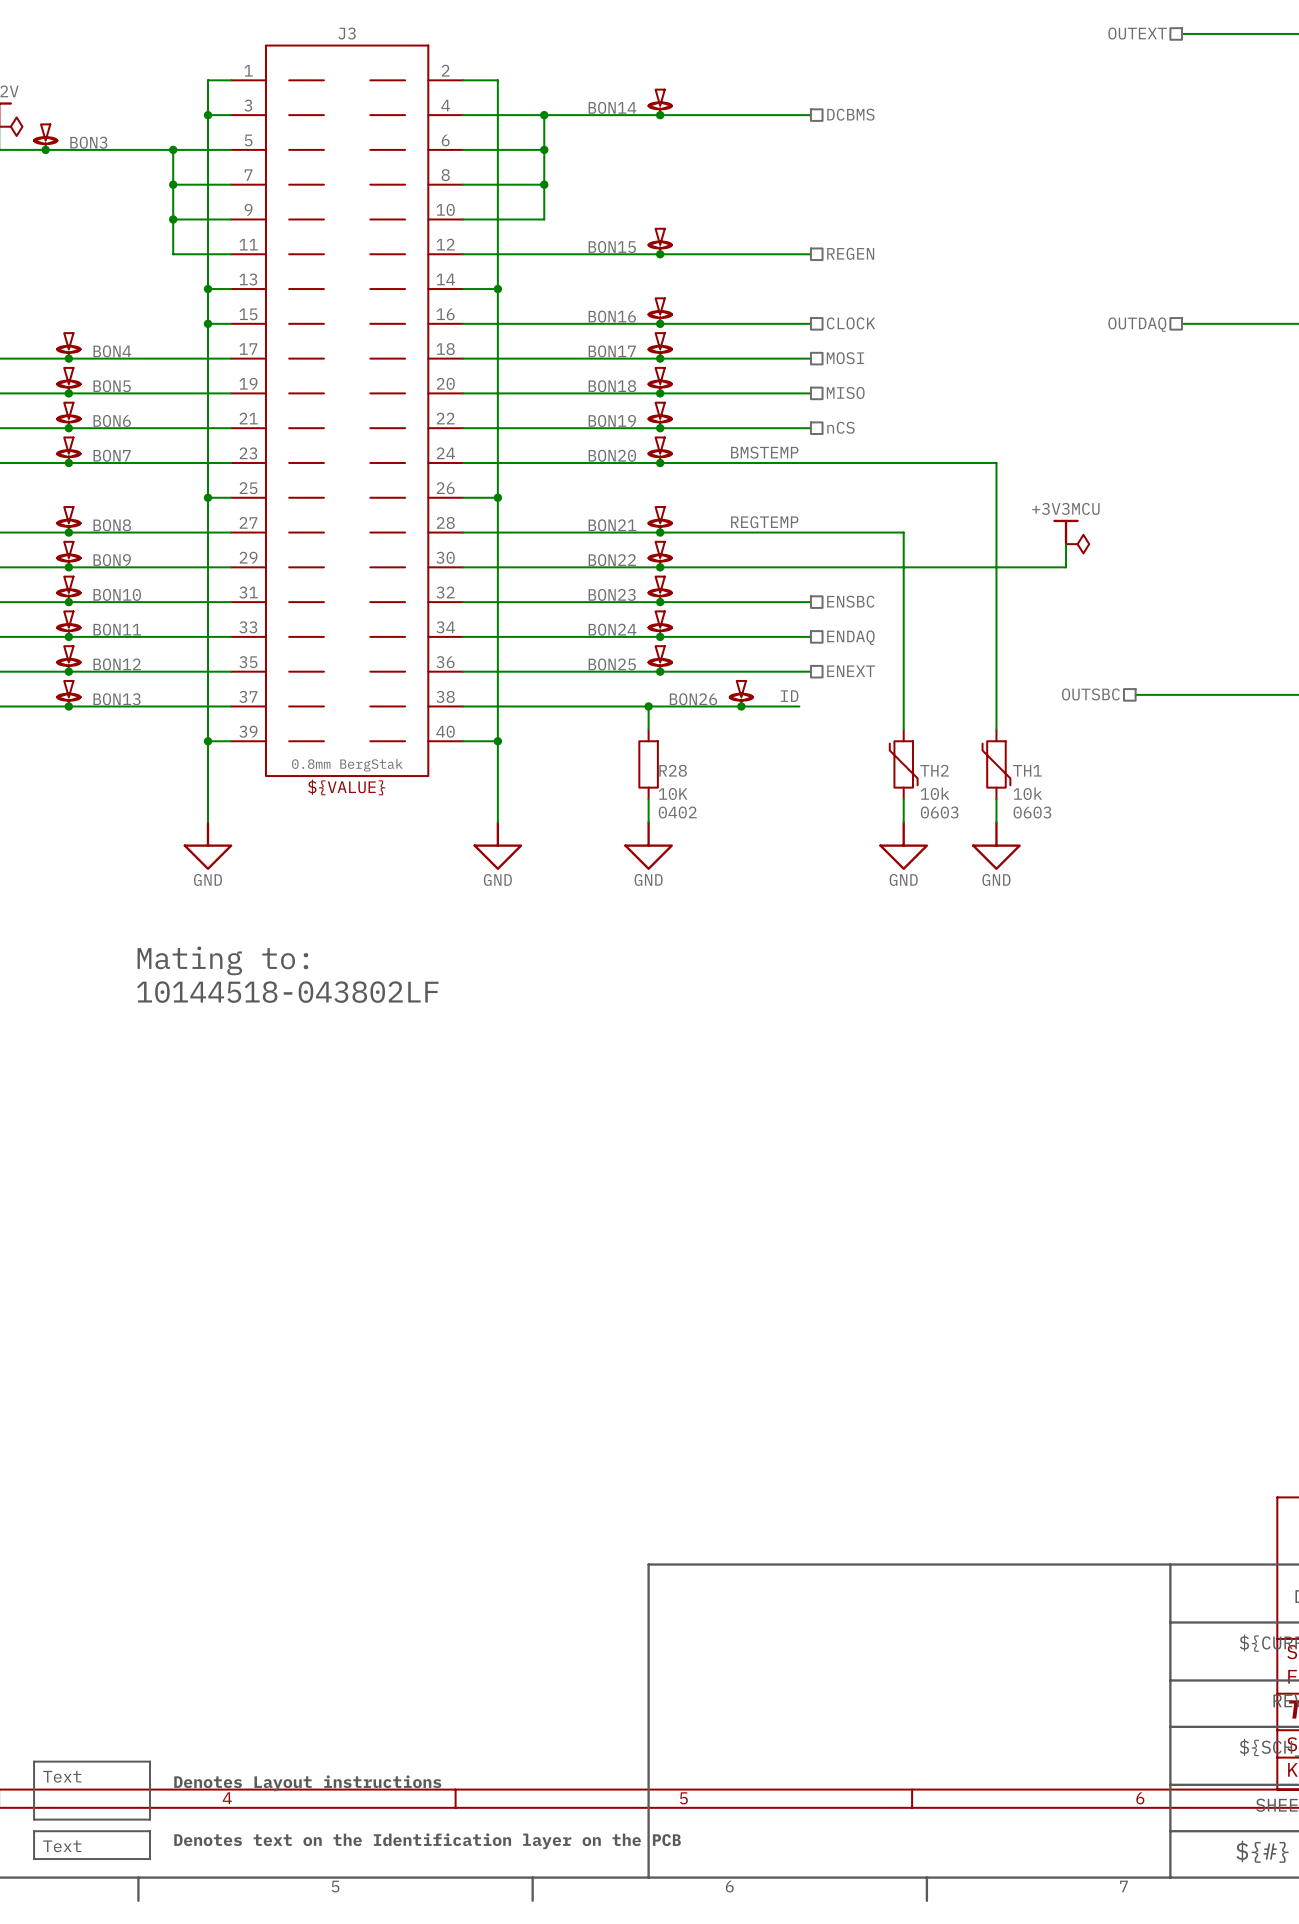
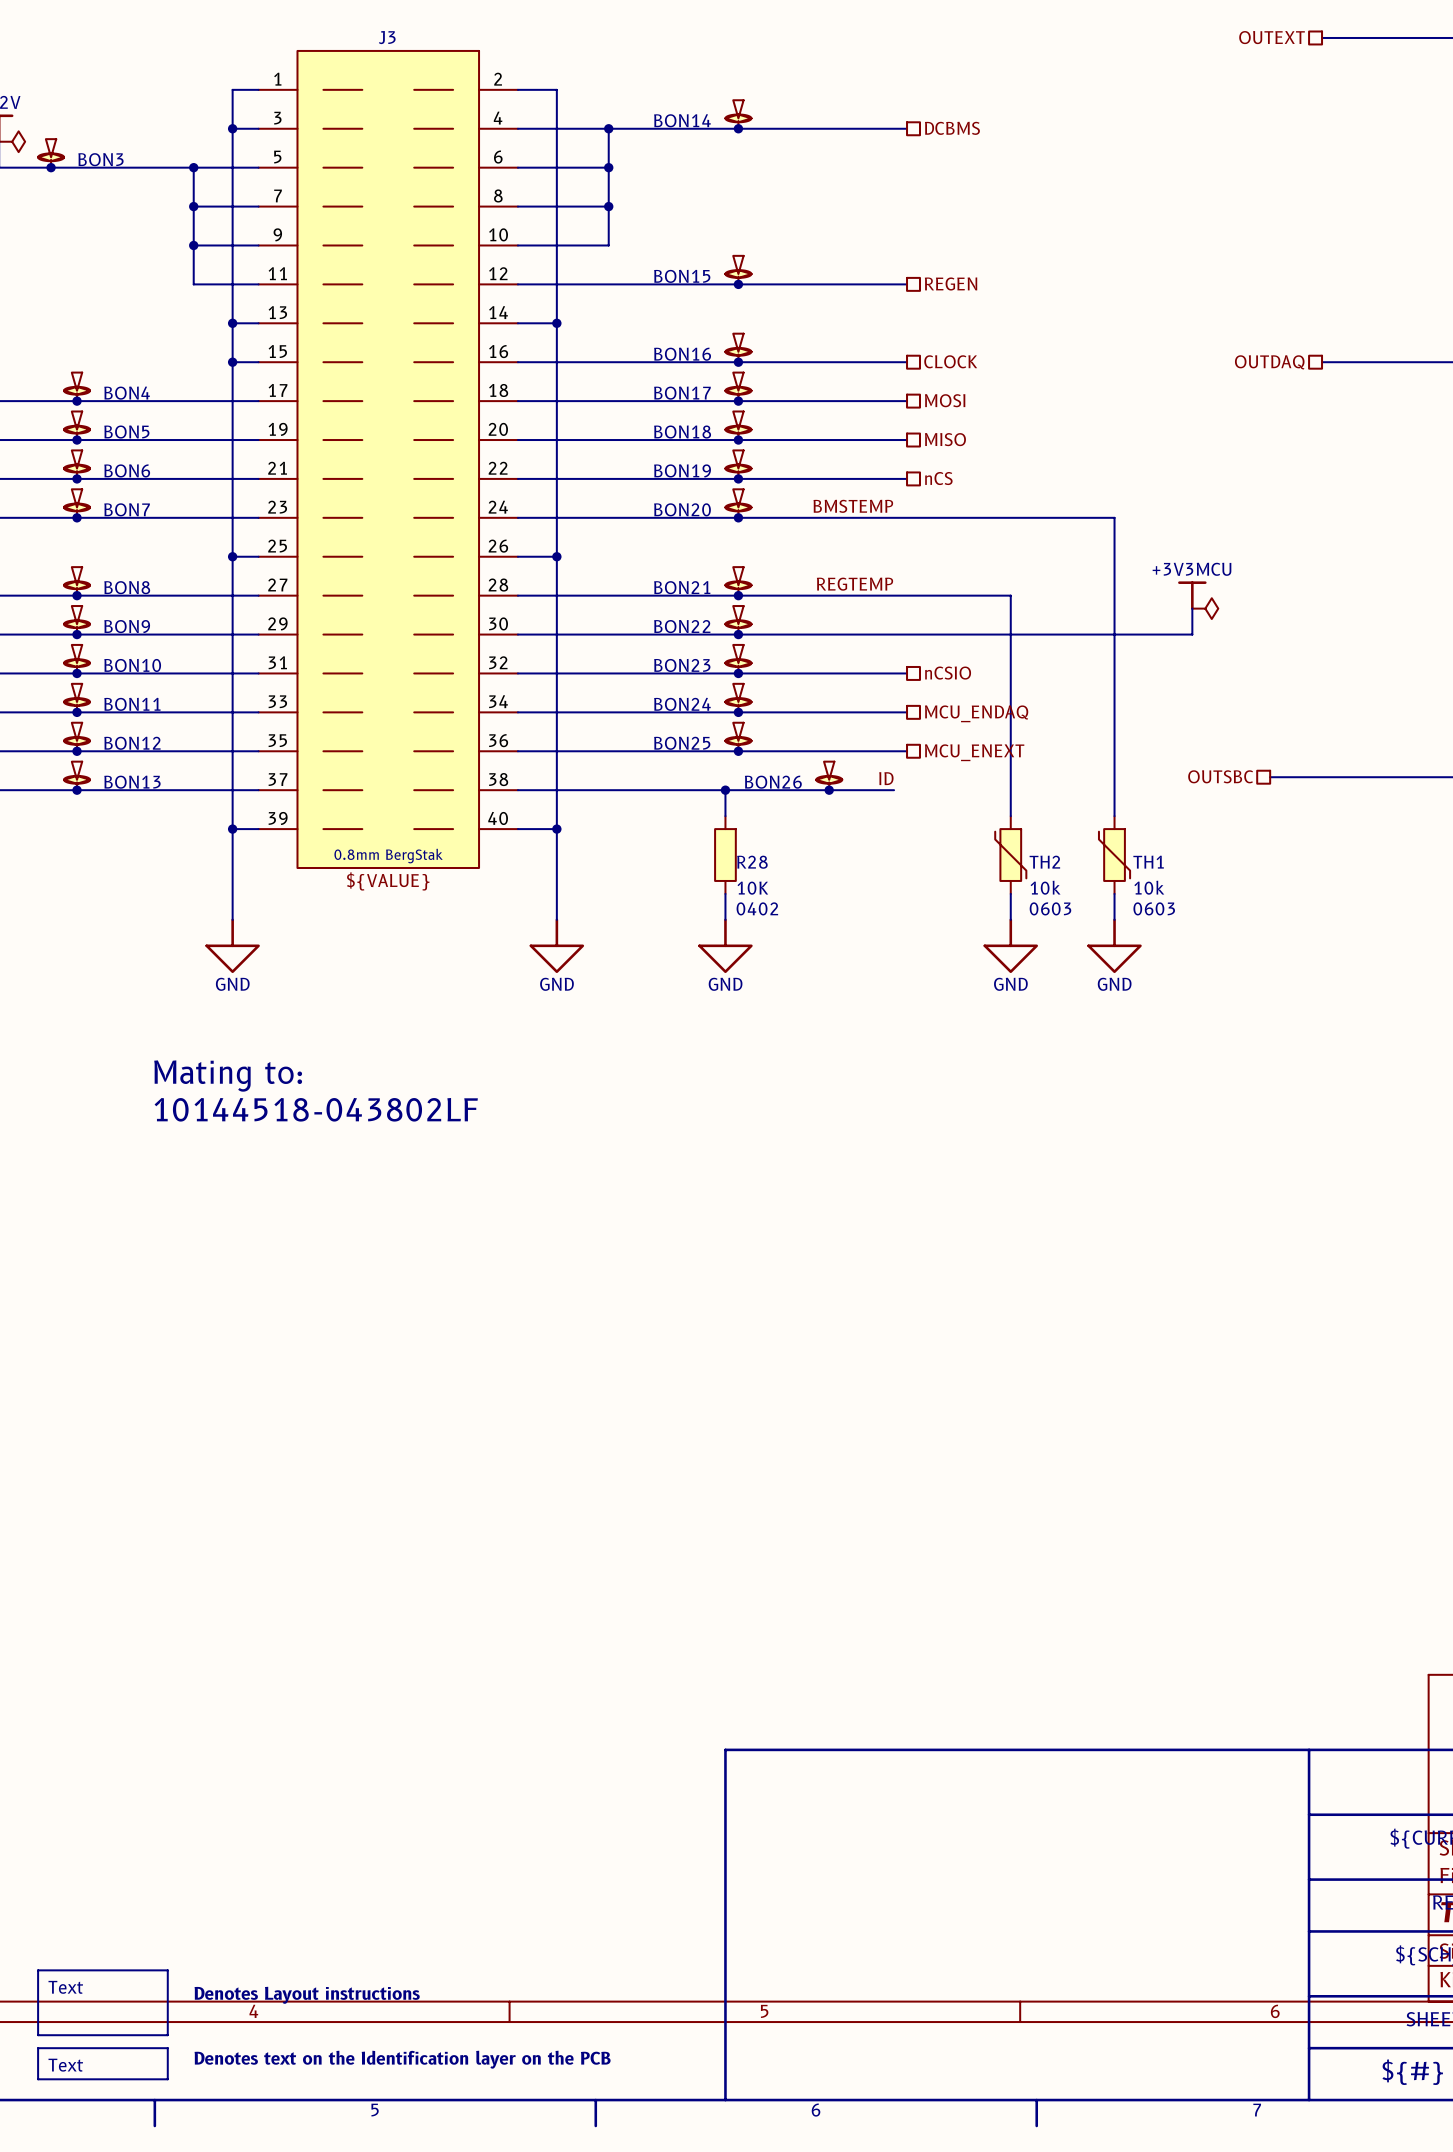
hierarchical label: ENSBC (850, 601) -> nCSIO (948, 673)
hierarchical label: ENDAQ (850, 637) -> MCU_ENDAQ (976, 713)
hierarchical label: ENEXT (851, 671) -> MCU_ENEXT (974, 752)

